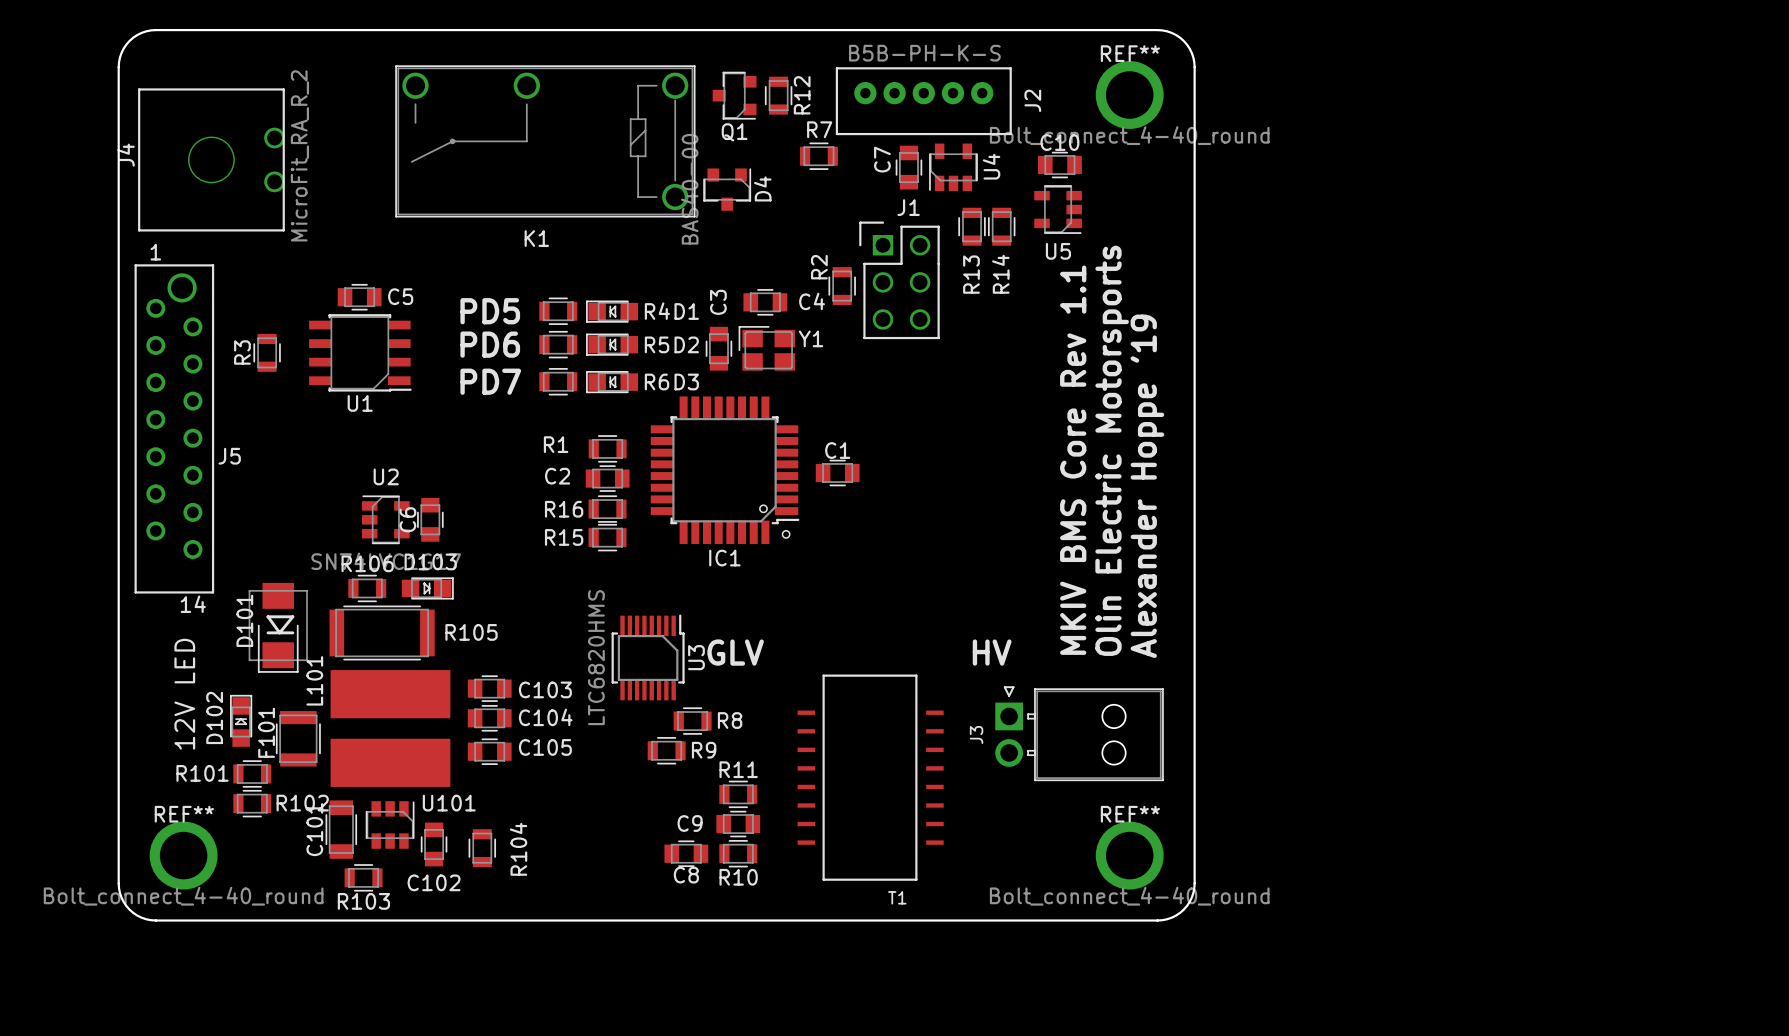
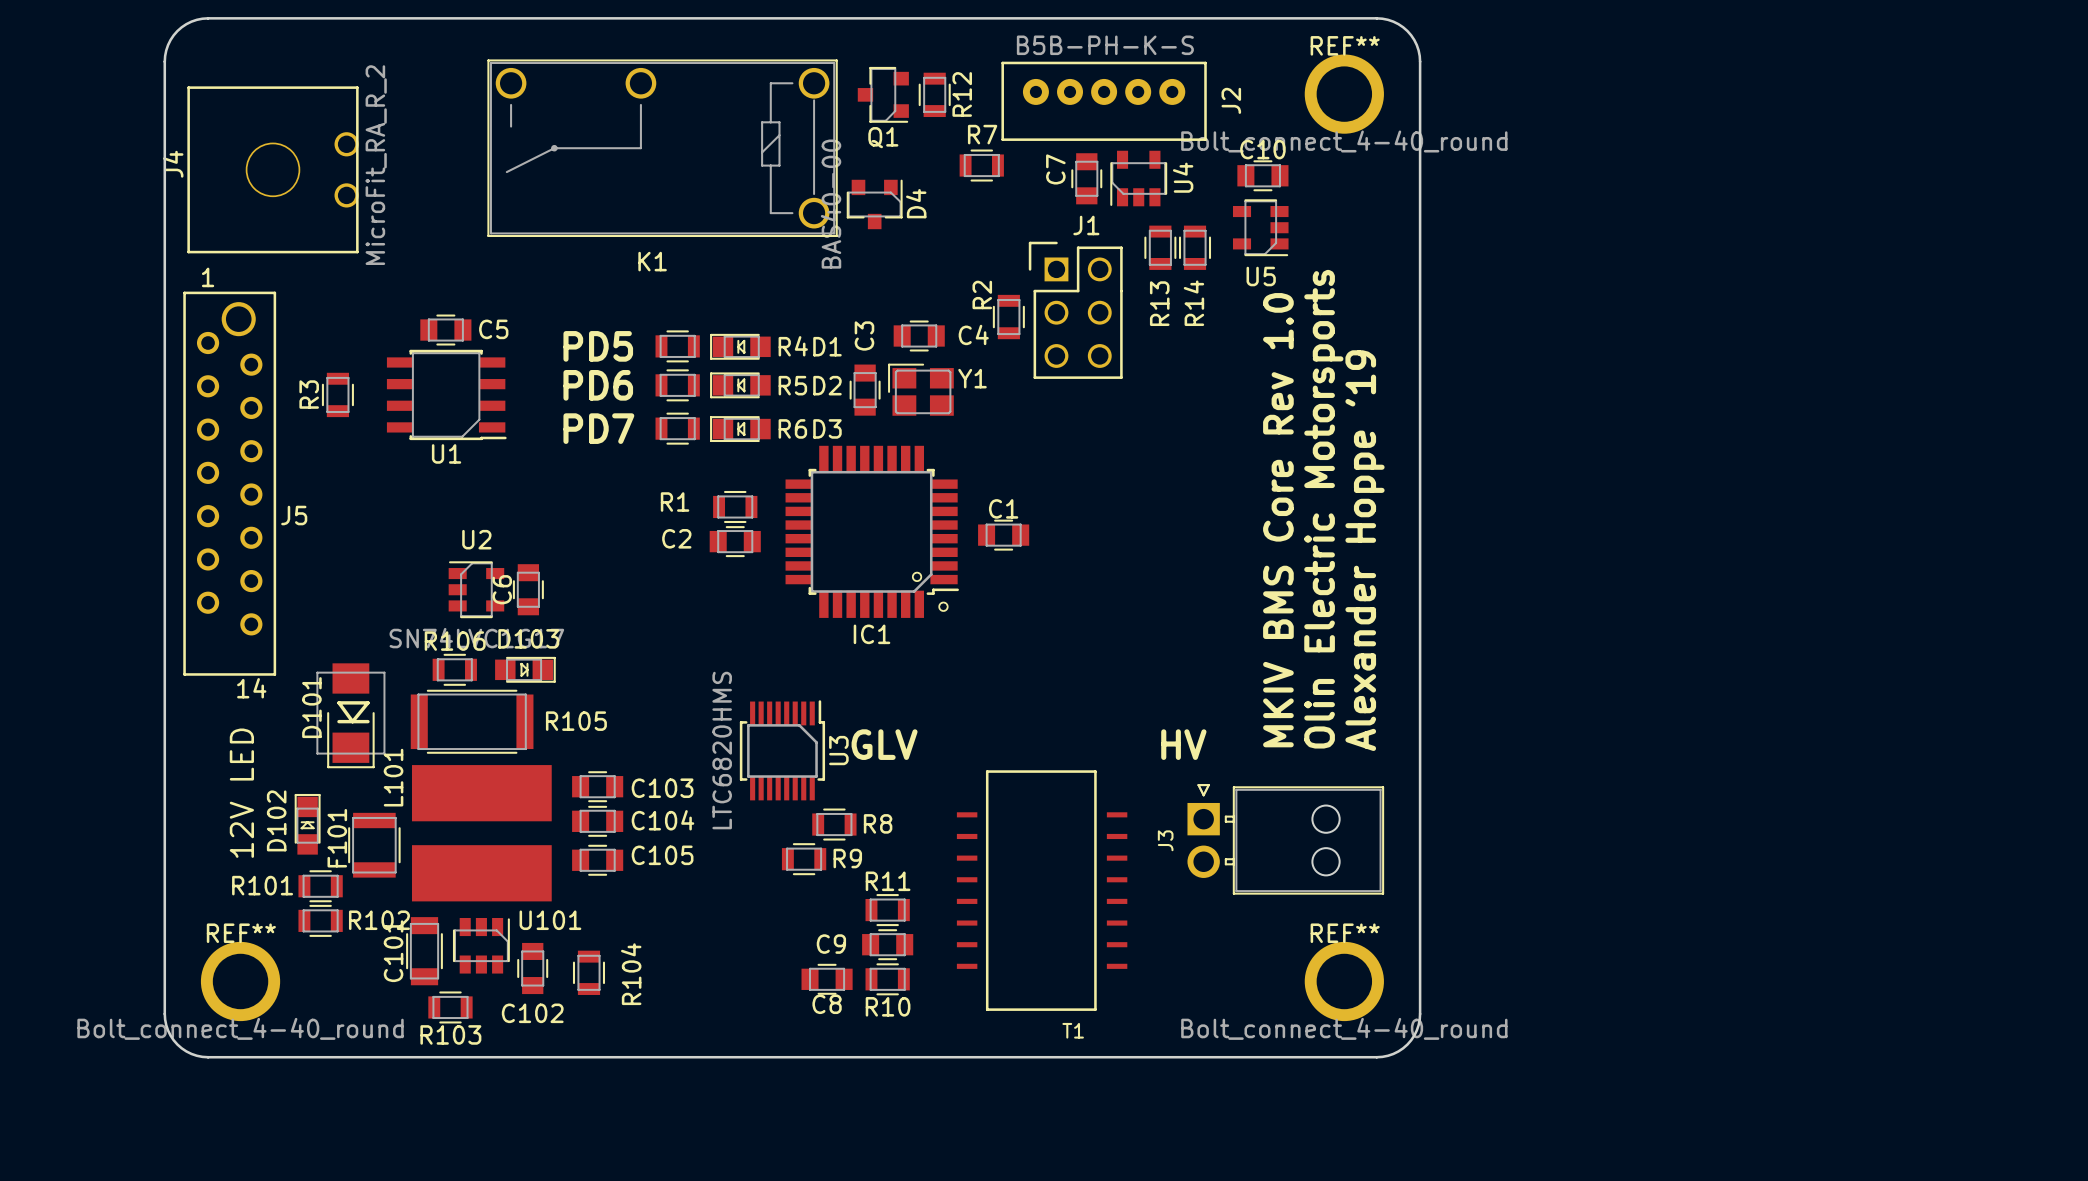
text: MKIV BMS Core Rev 1.1 (1073, 460) -> MKIV BMS Core Rev 1.0 (1278, 520)
R16: (607, 509) -> none
R15: (607, 537) -> none

